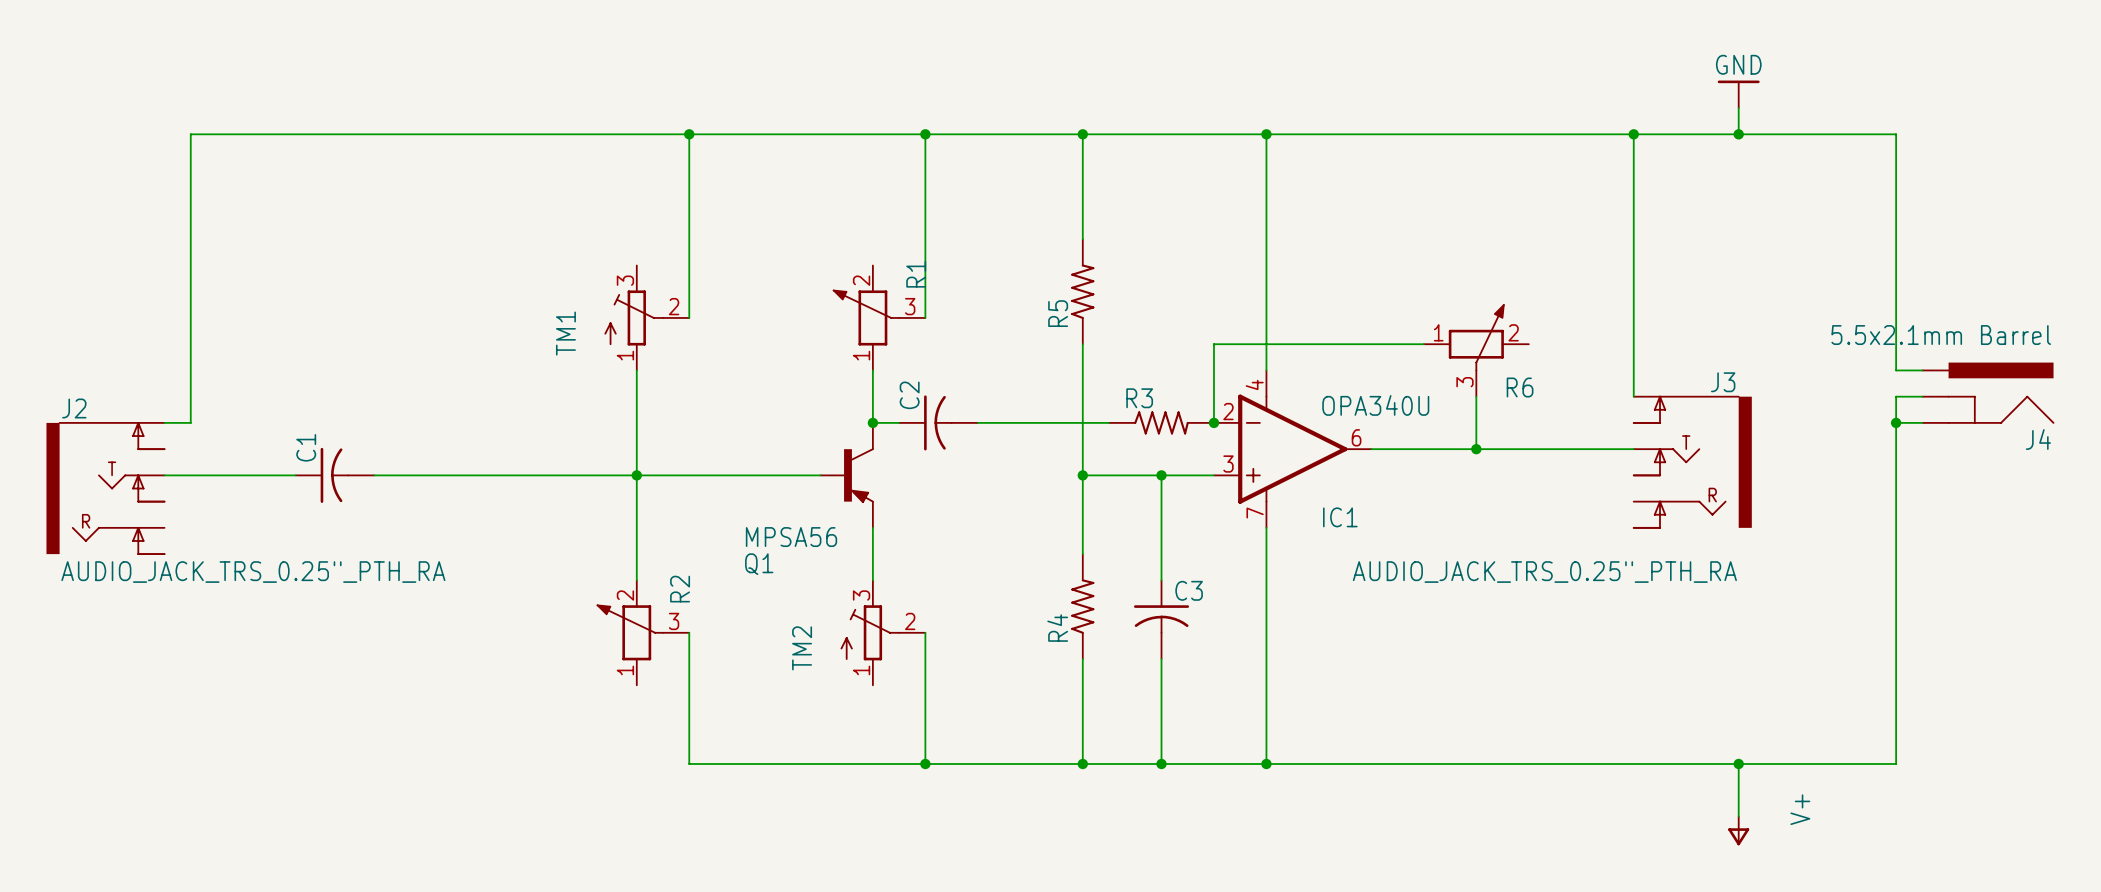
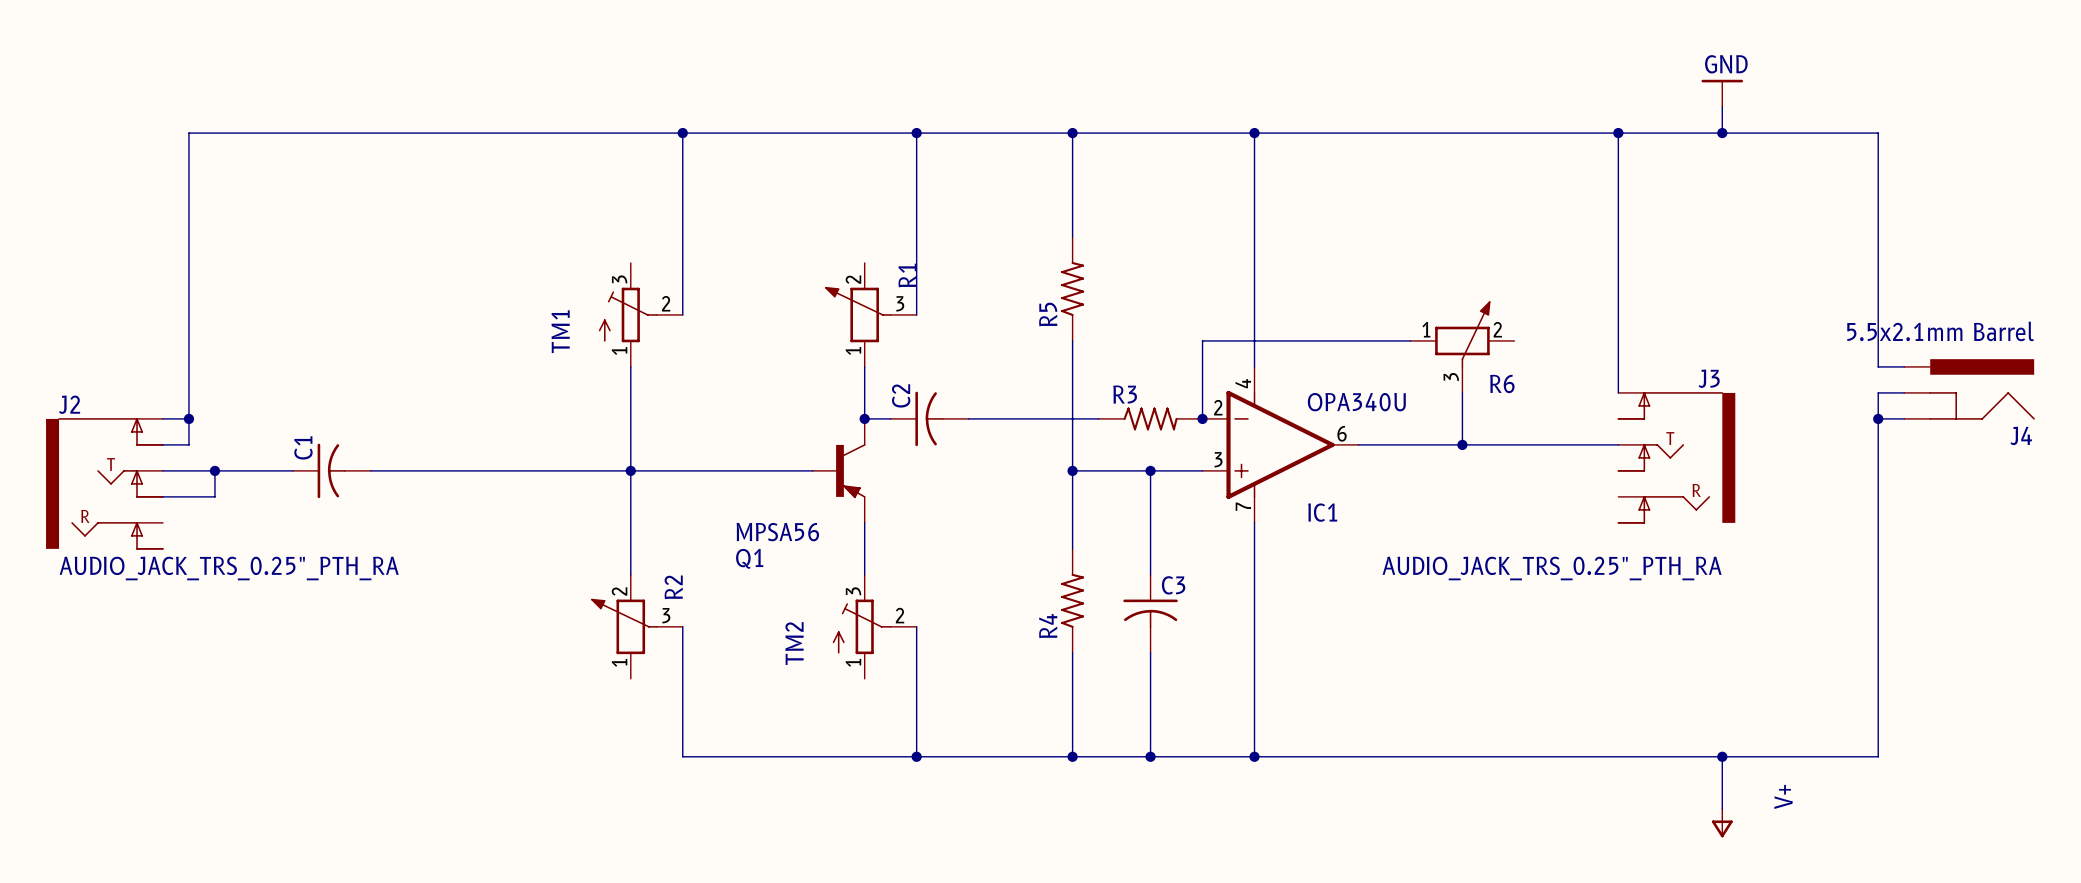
wire: none -> (188, 418) (188, 444) (162, 444)
junction: none -> (188, 418)
wire: none -> (214, 470) (214, 496) (162, 496)
junction: none -> (214, 470)

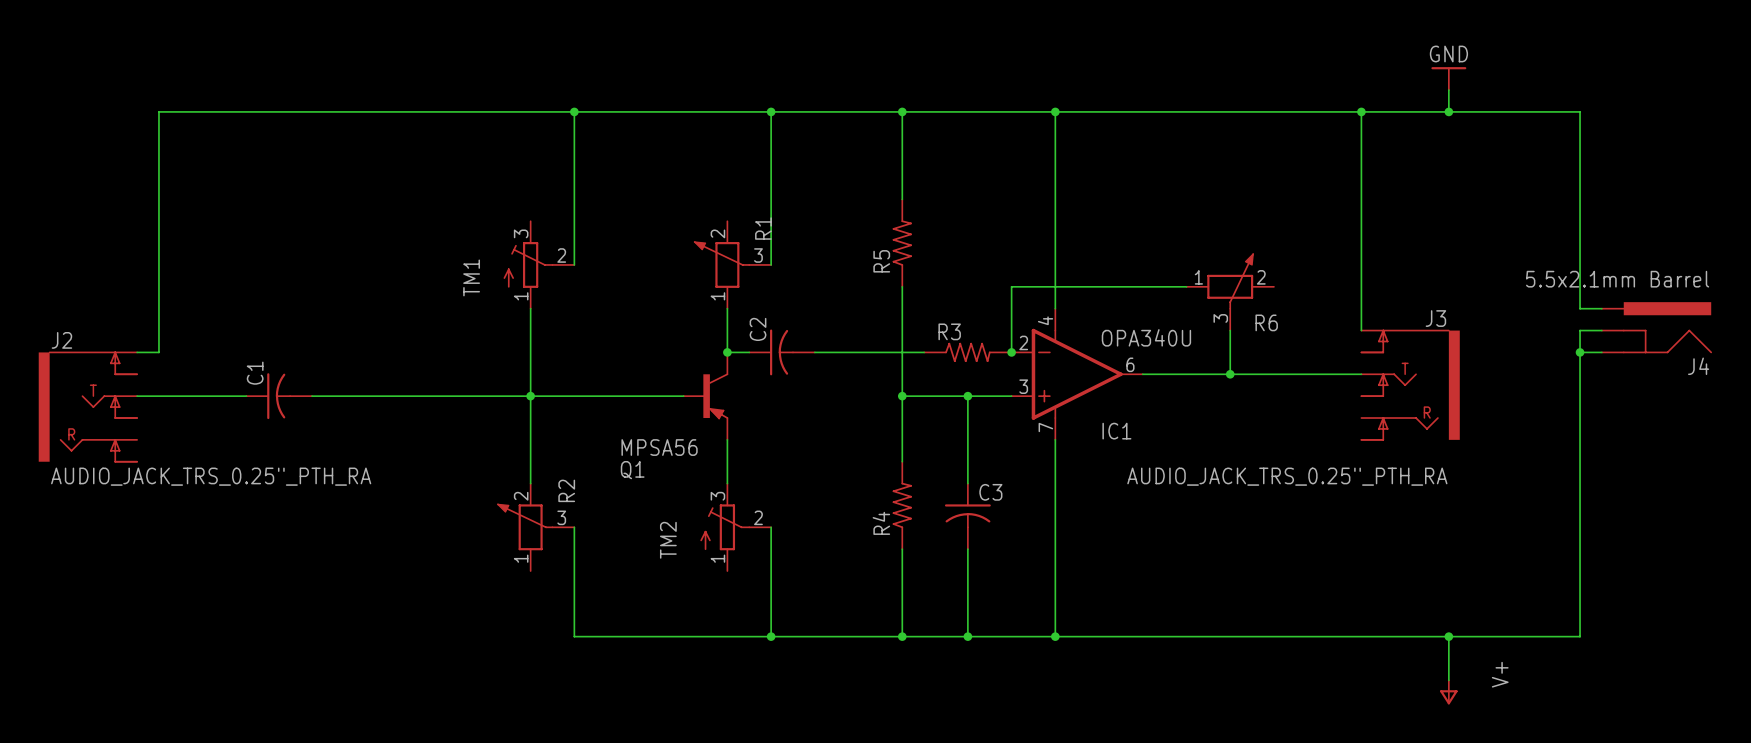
wire: (188, 418) (188, 444) (162, 444) -> none
junction: (188, 418) -> none
wire: (214, 470) (214, 496) (162, 496) -> none
junction: (214, 470) -> none

